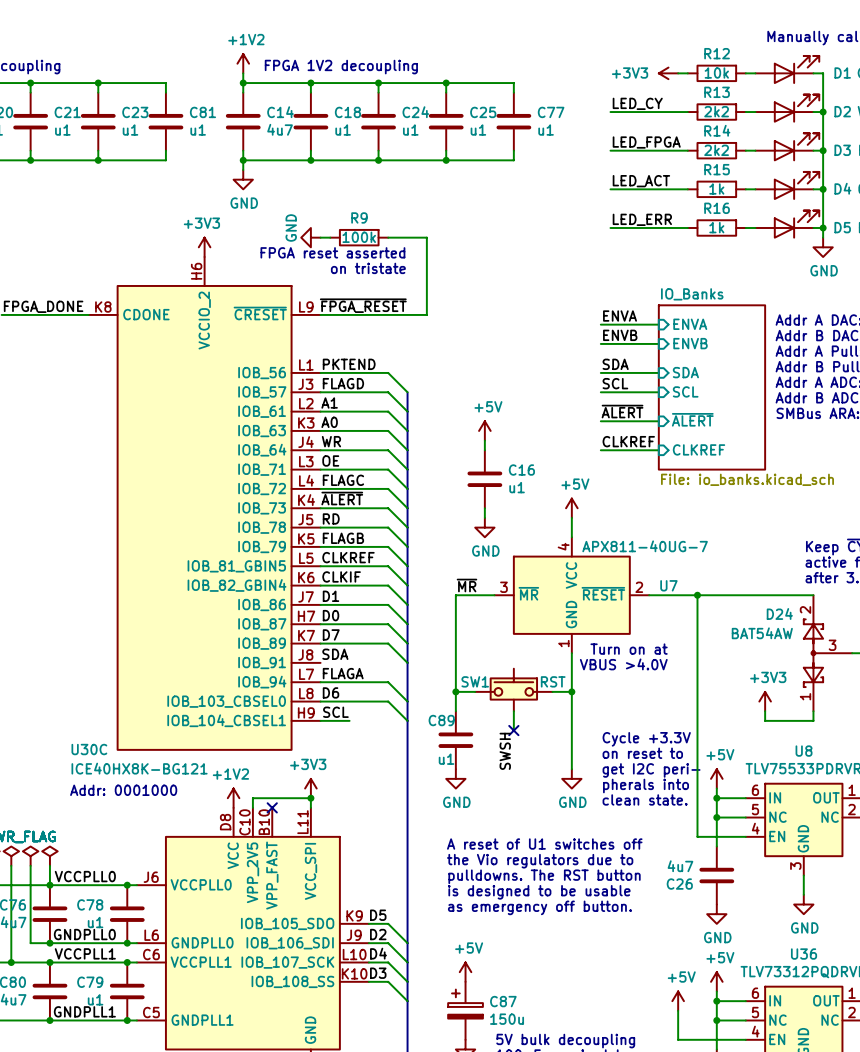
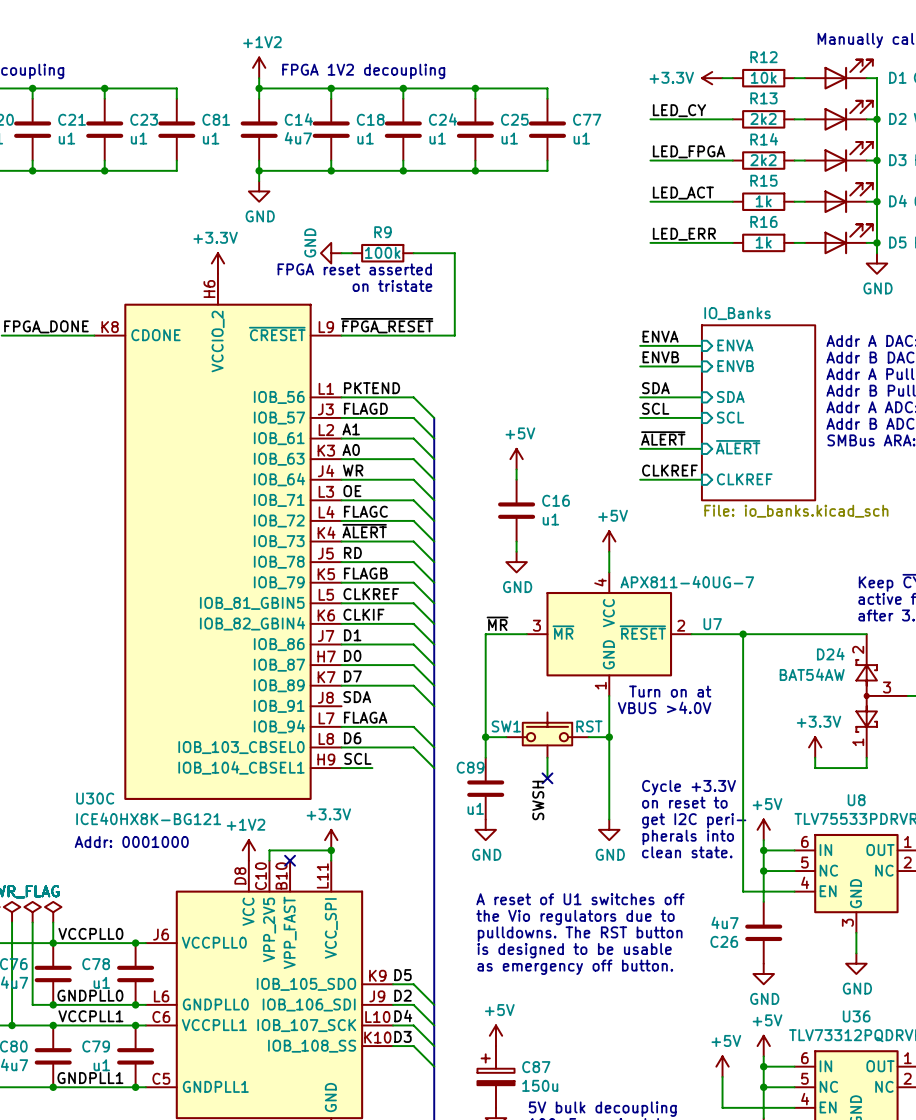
power symbol: +3V3 (668, 73) -> +3.3V (712, 78)
power symbol: +3V3 (204, 247) -> +3.3V (217, 263)
power symbol: +3V3 (765, 701) -> +3.3V (815, 747)
power symbol: +3V3 (310, 788) -> +3.3V (331, 840)

